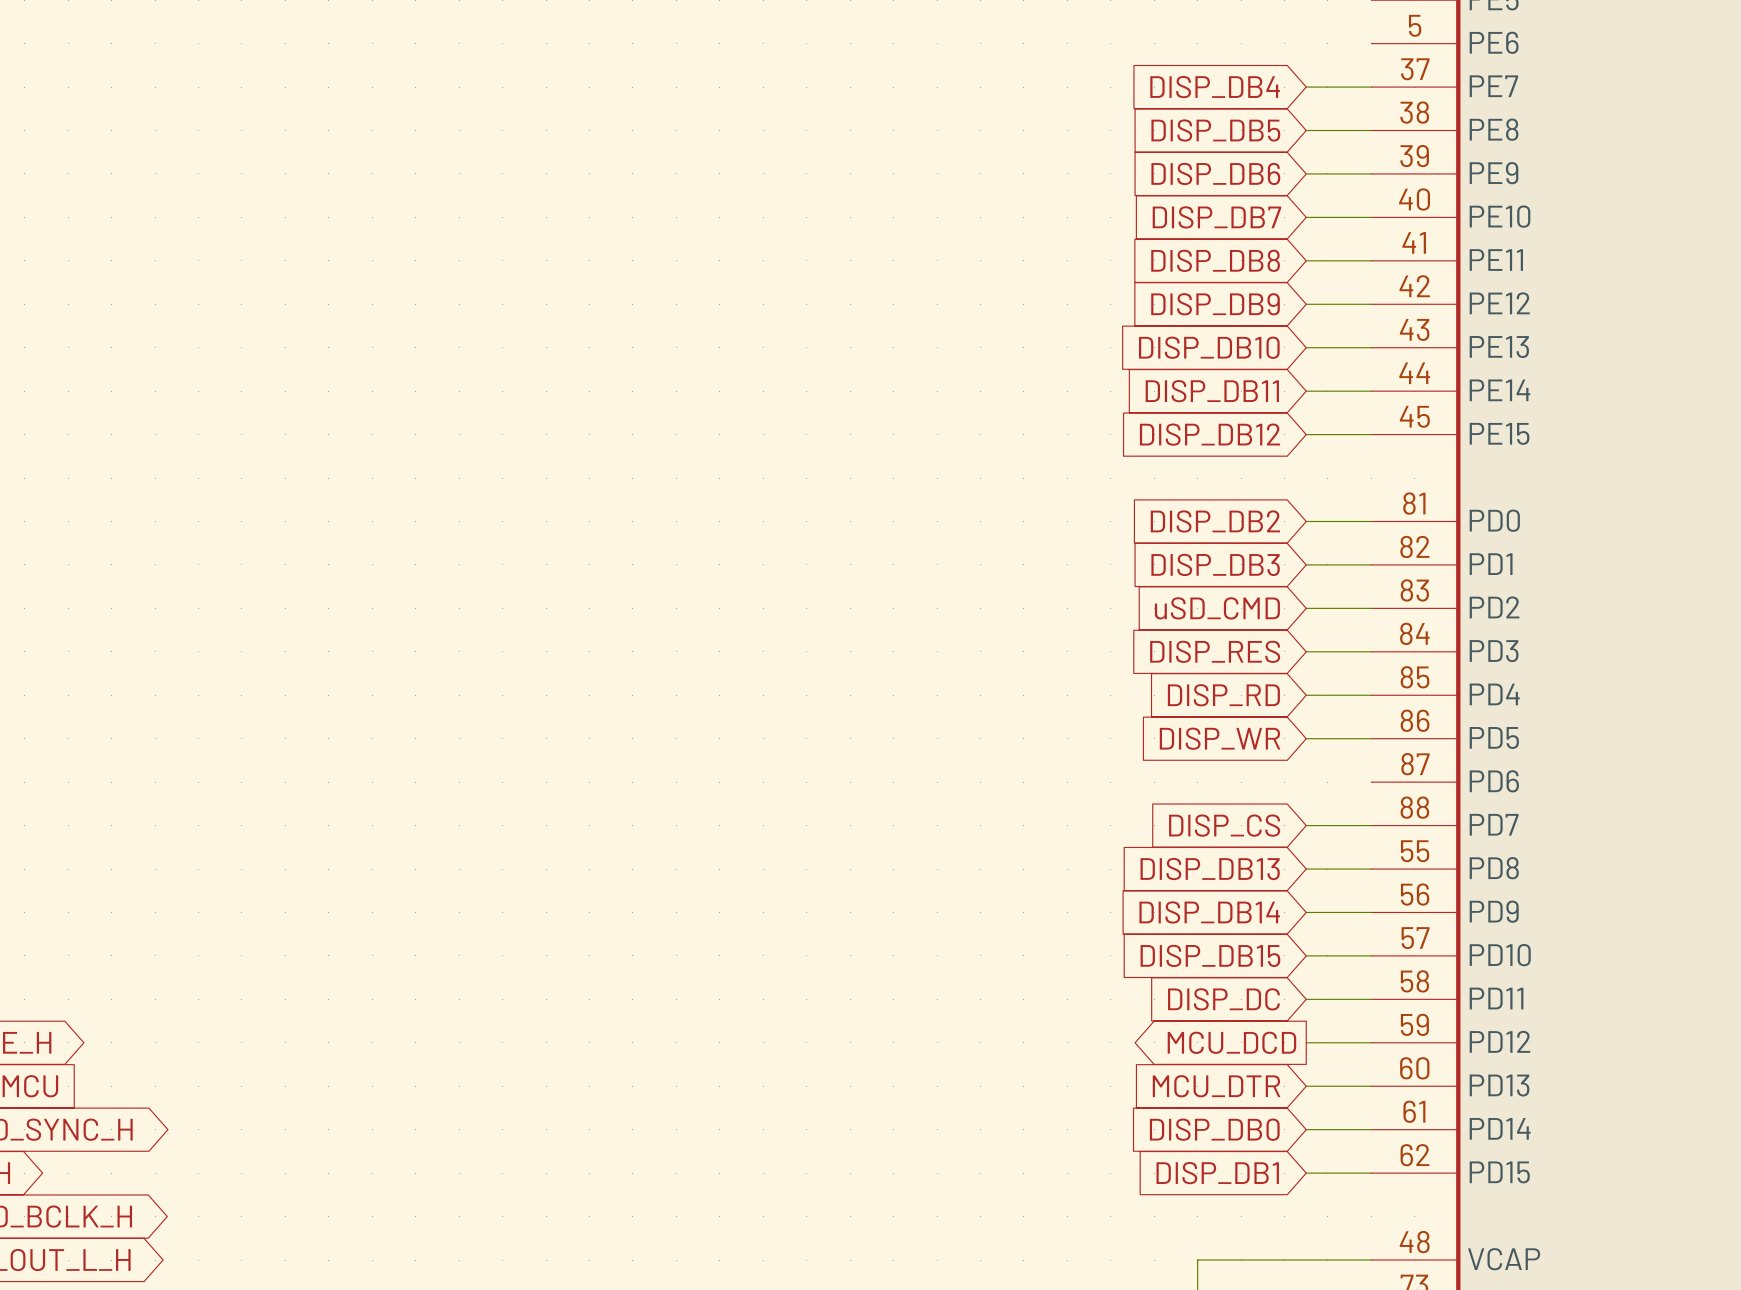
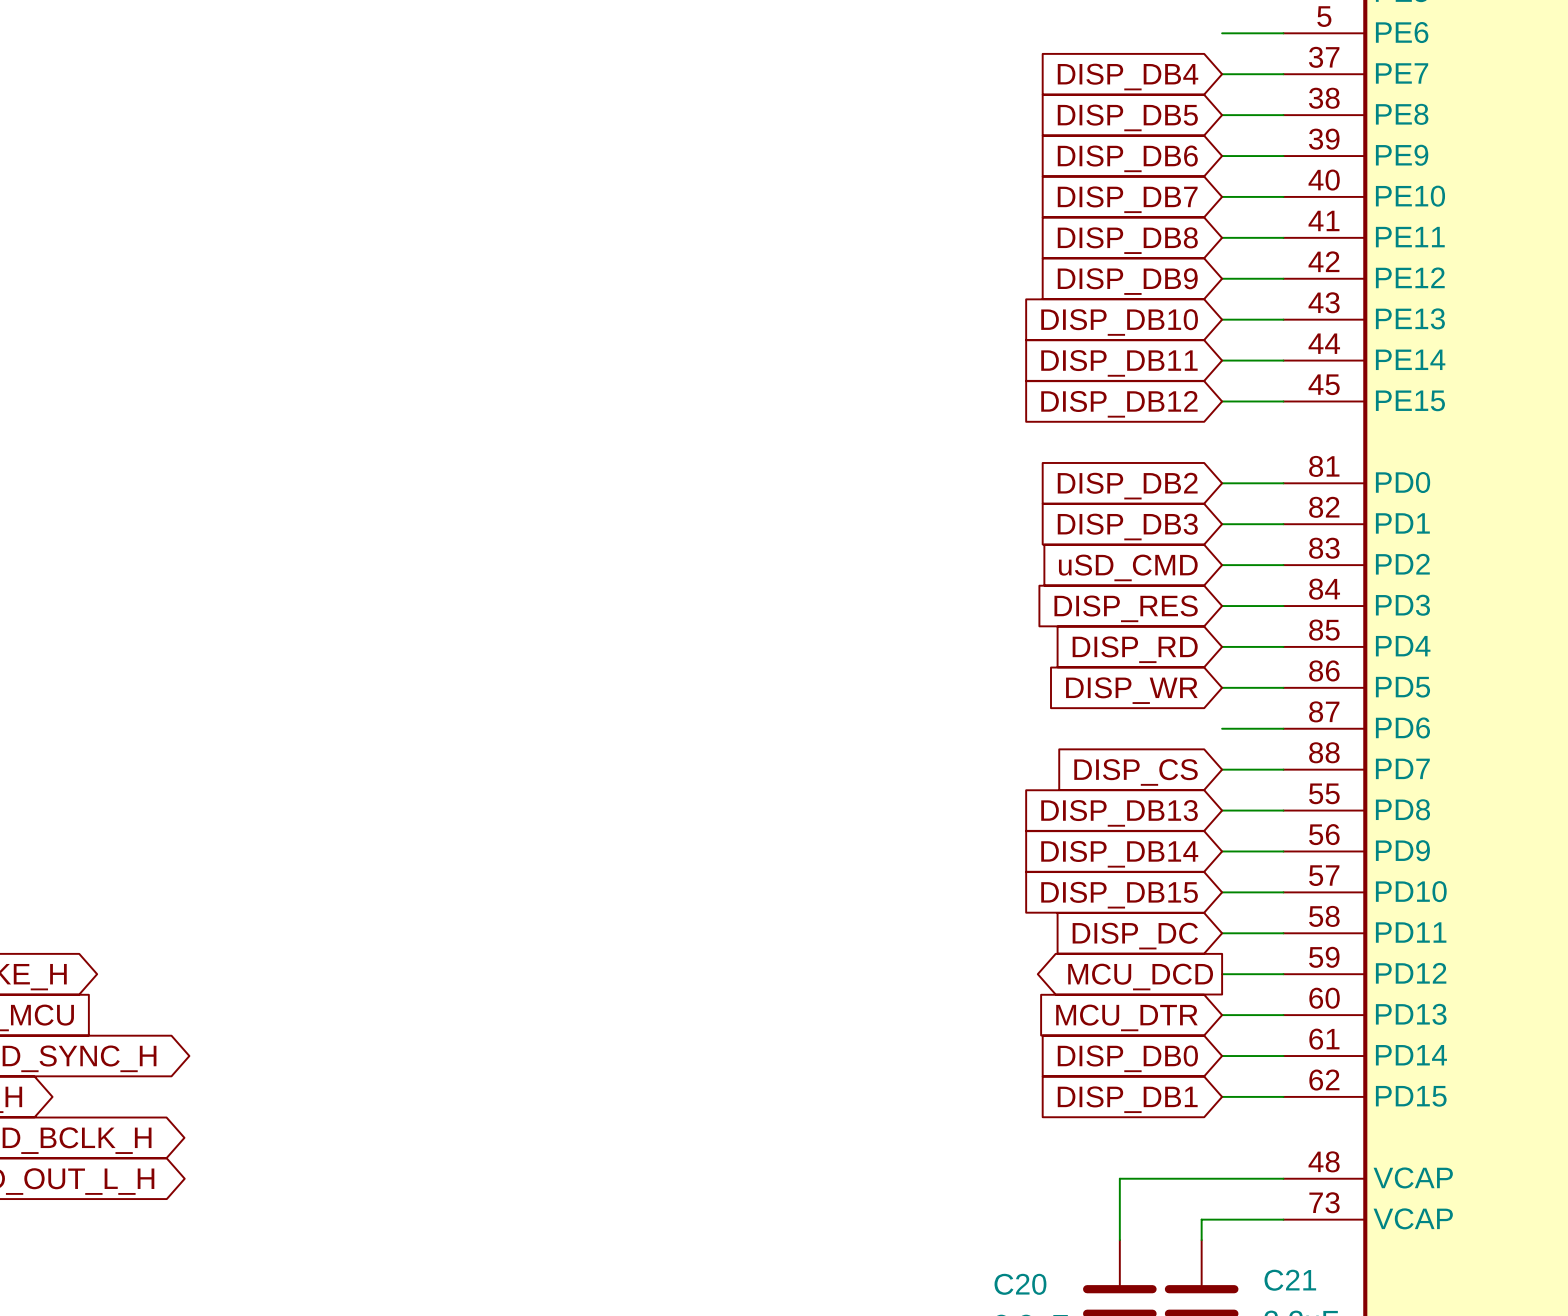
wire: none -> (1222, 33) (1283, 33)
wire: none -> (1222, 728) (1283, 728)

